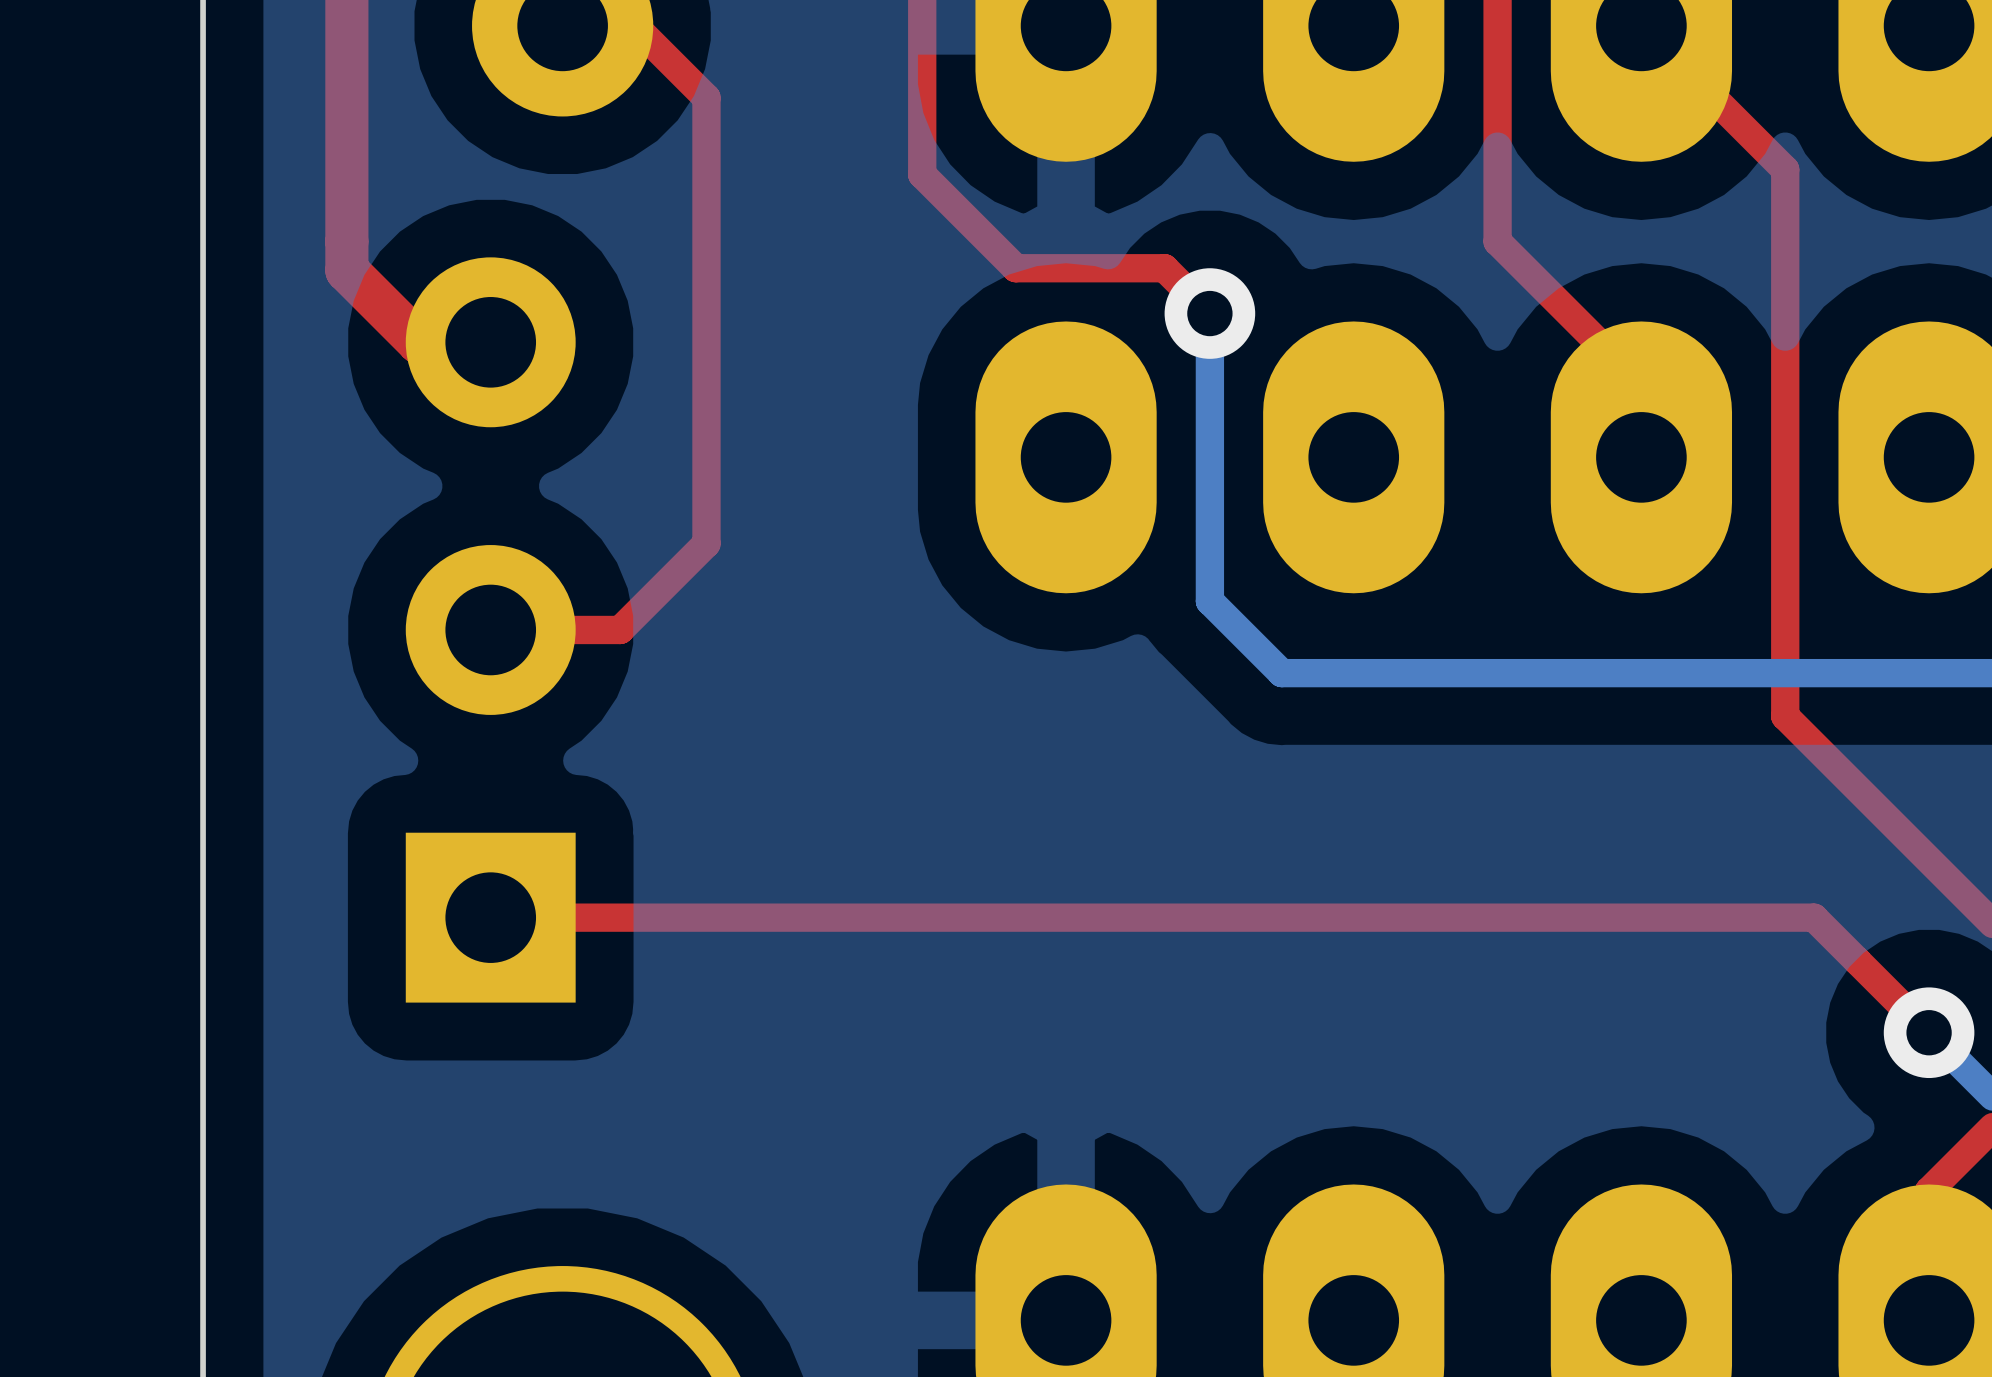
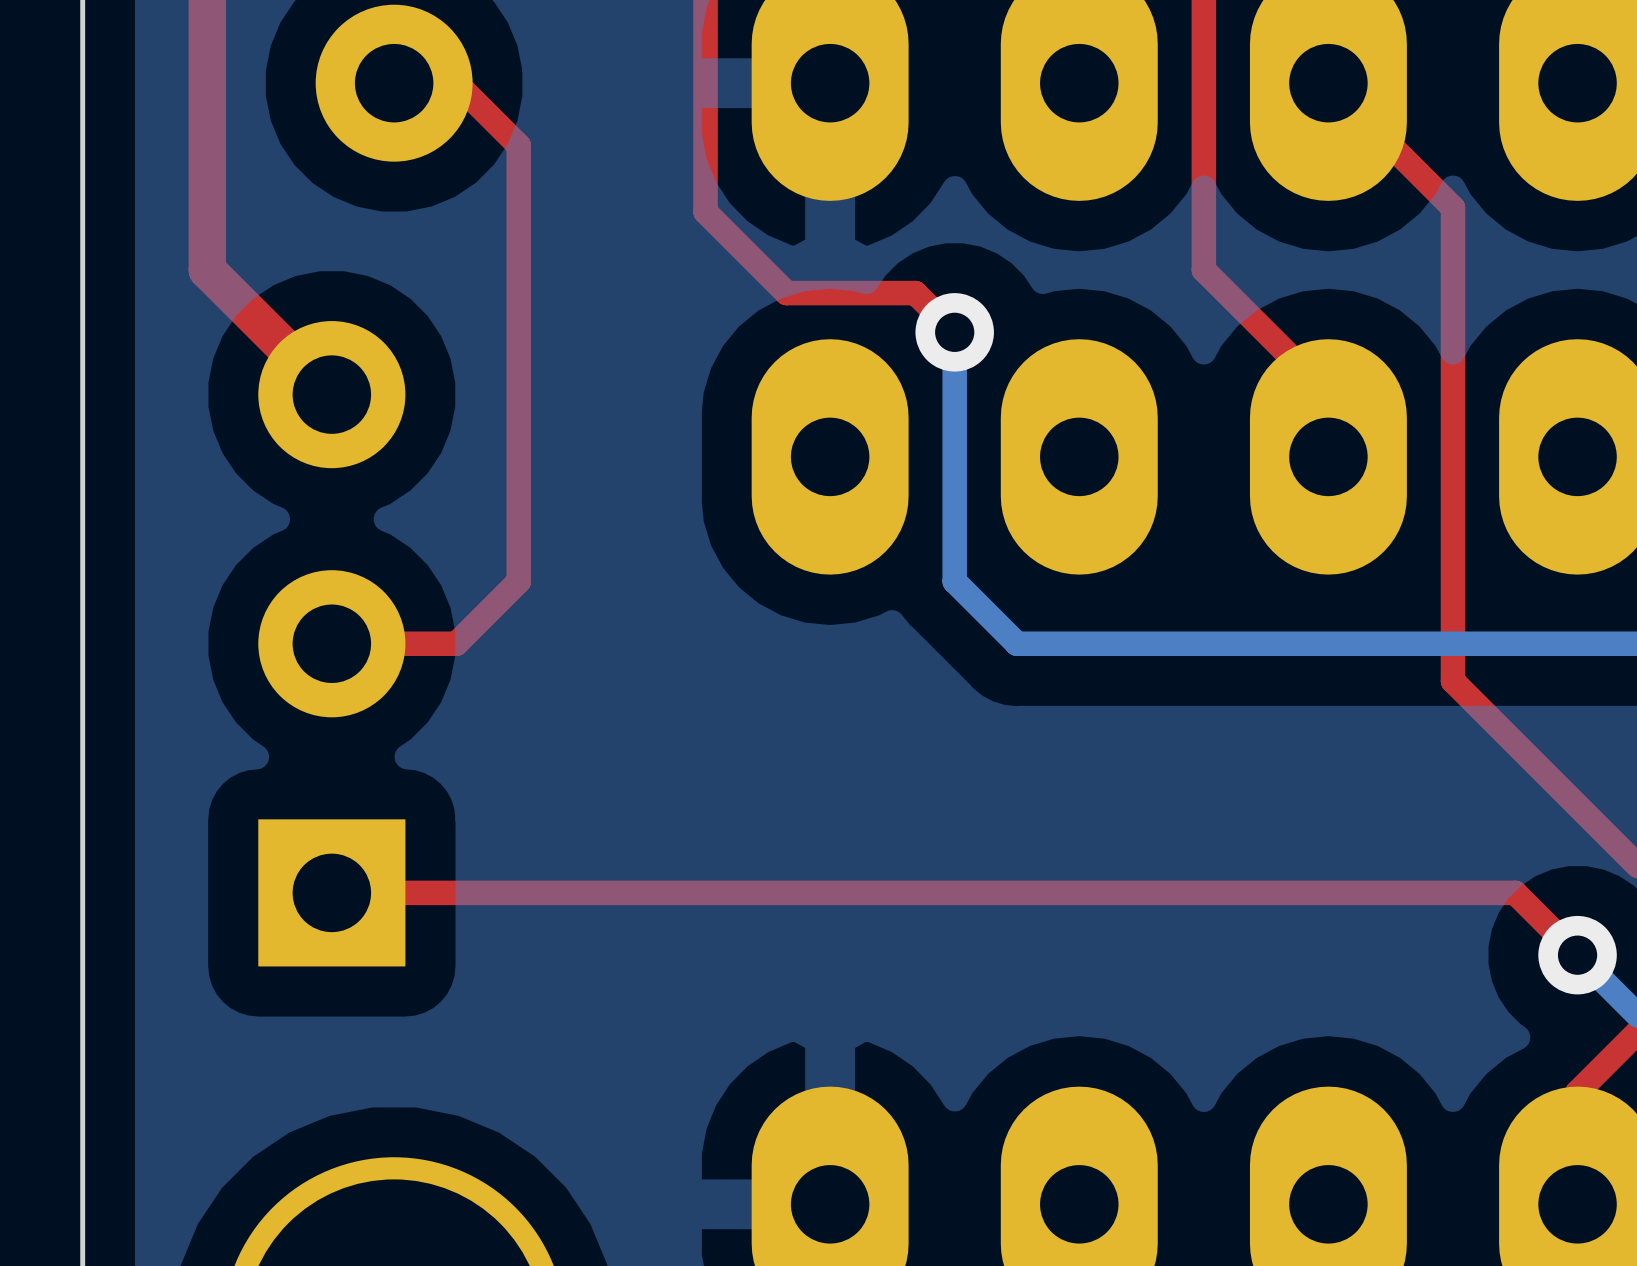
top track: (346, 241) (346, 270) (418, 342) (490, 342) -> (207, 270) (331, 394)
top track: (706, 543) (620, 629) (490, 629) -> (518, 531) (518, 581) (456, 643) (331, 643)
part position: (490, 629) -> (331, 643)
top track: (490, 917) (1814, 917) (1857, 960) -> (331, 892) (1515, 892)

